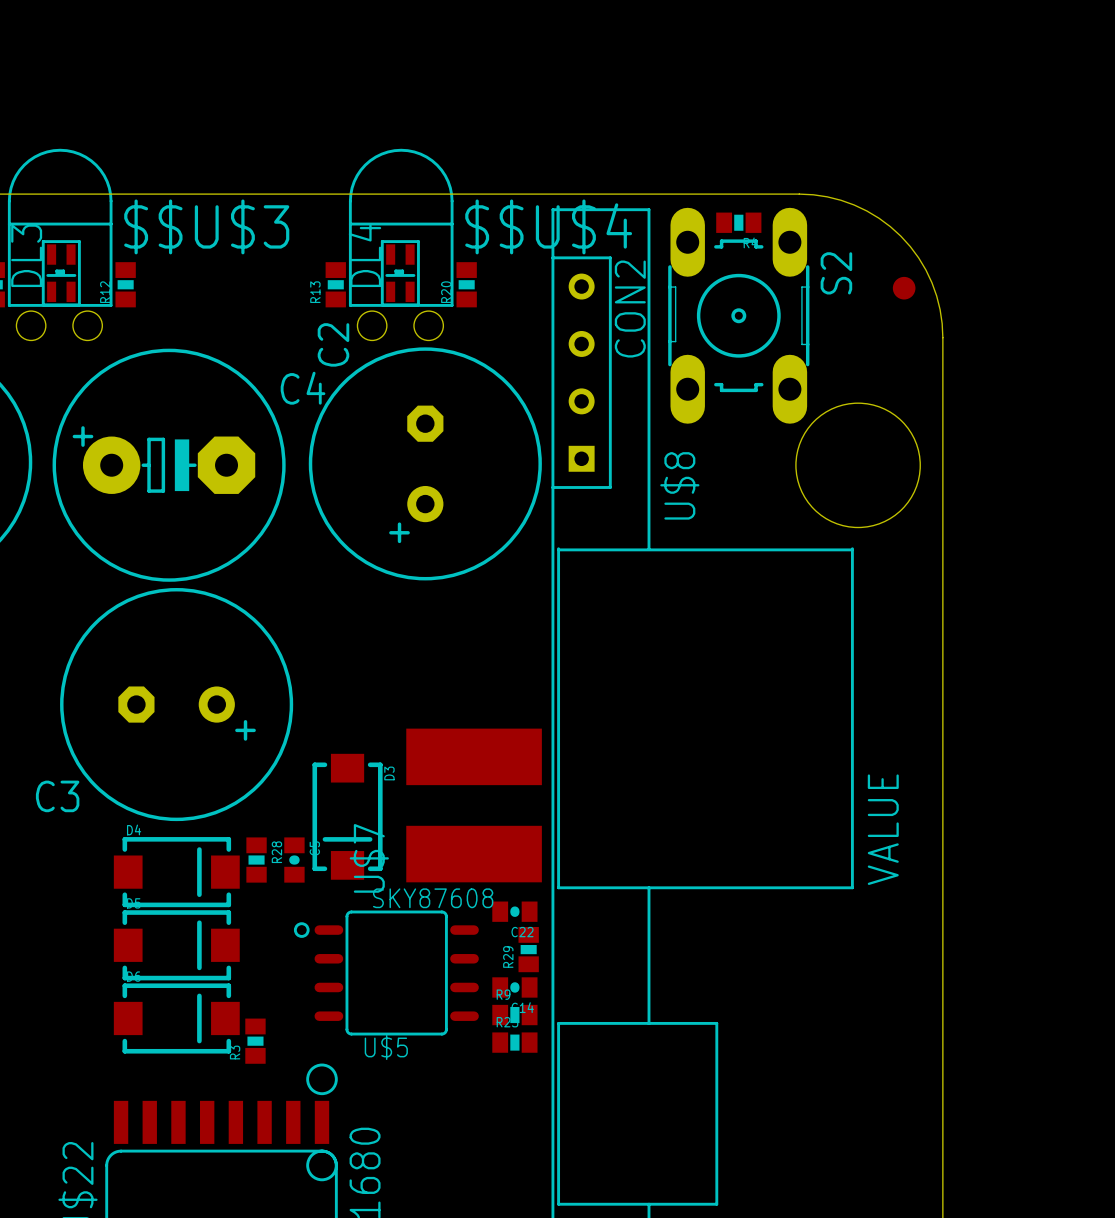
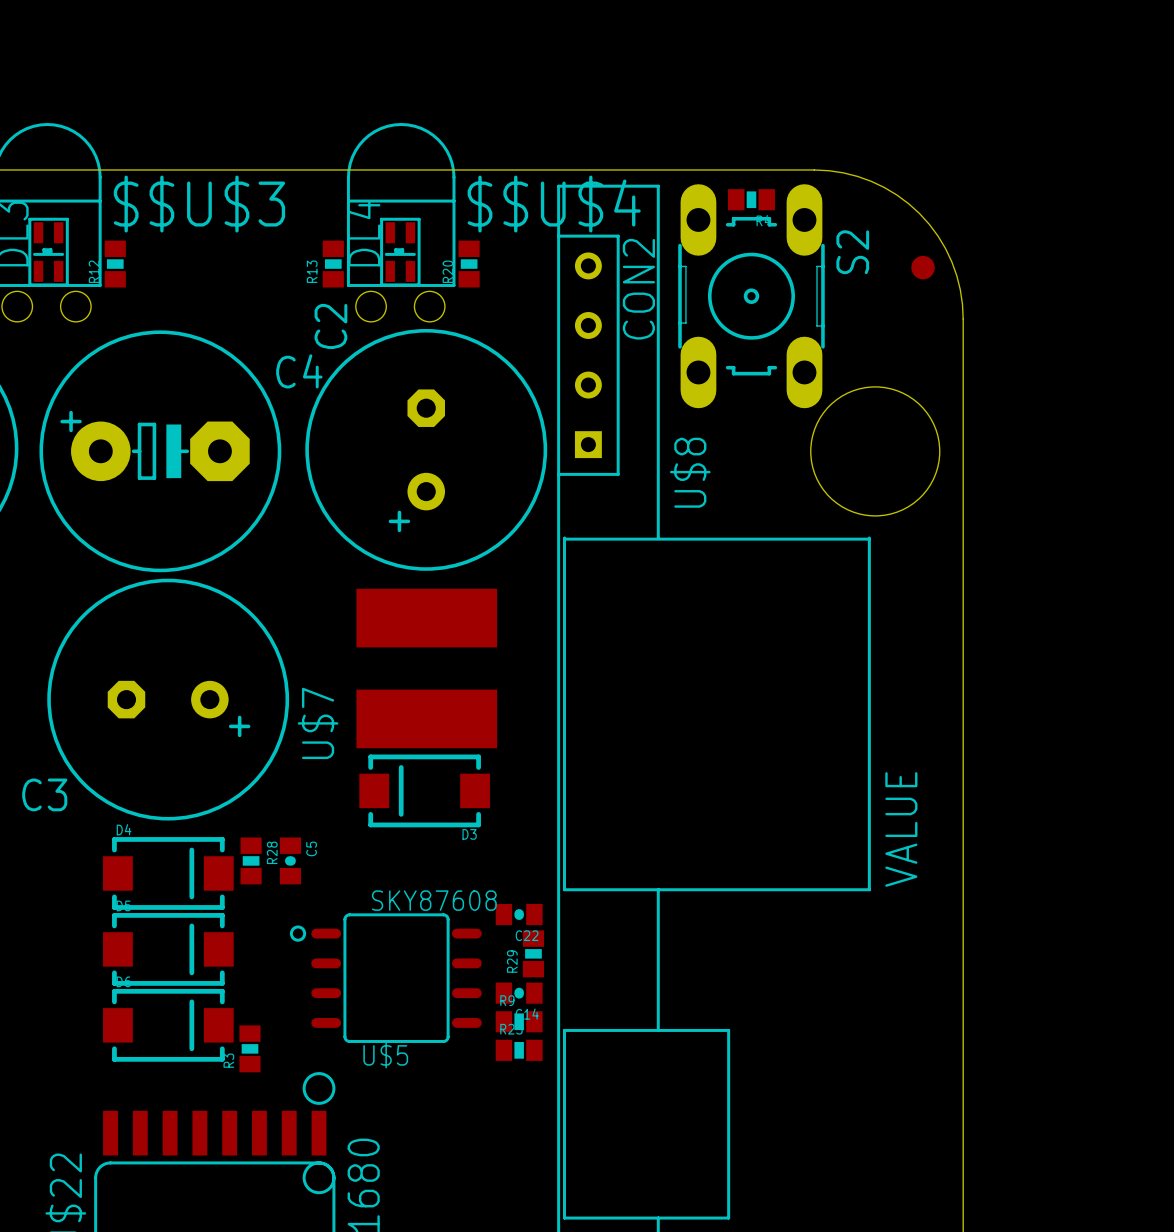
U$7 position: (474, 805) -> (426, 668)
D3 rotation: 0° (347, 816) -> 90° clockwise (424, 790)
D3 position: (347, 816) -> (424, 790)

